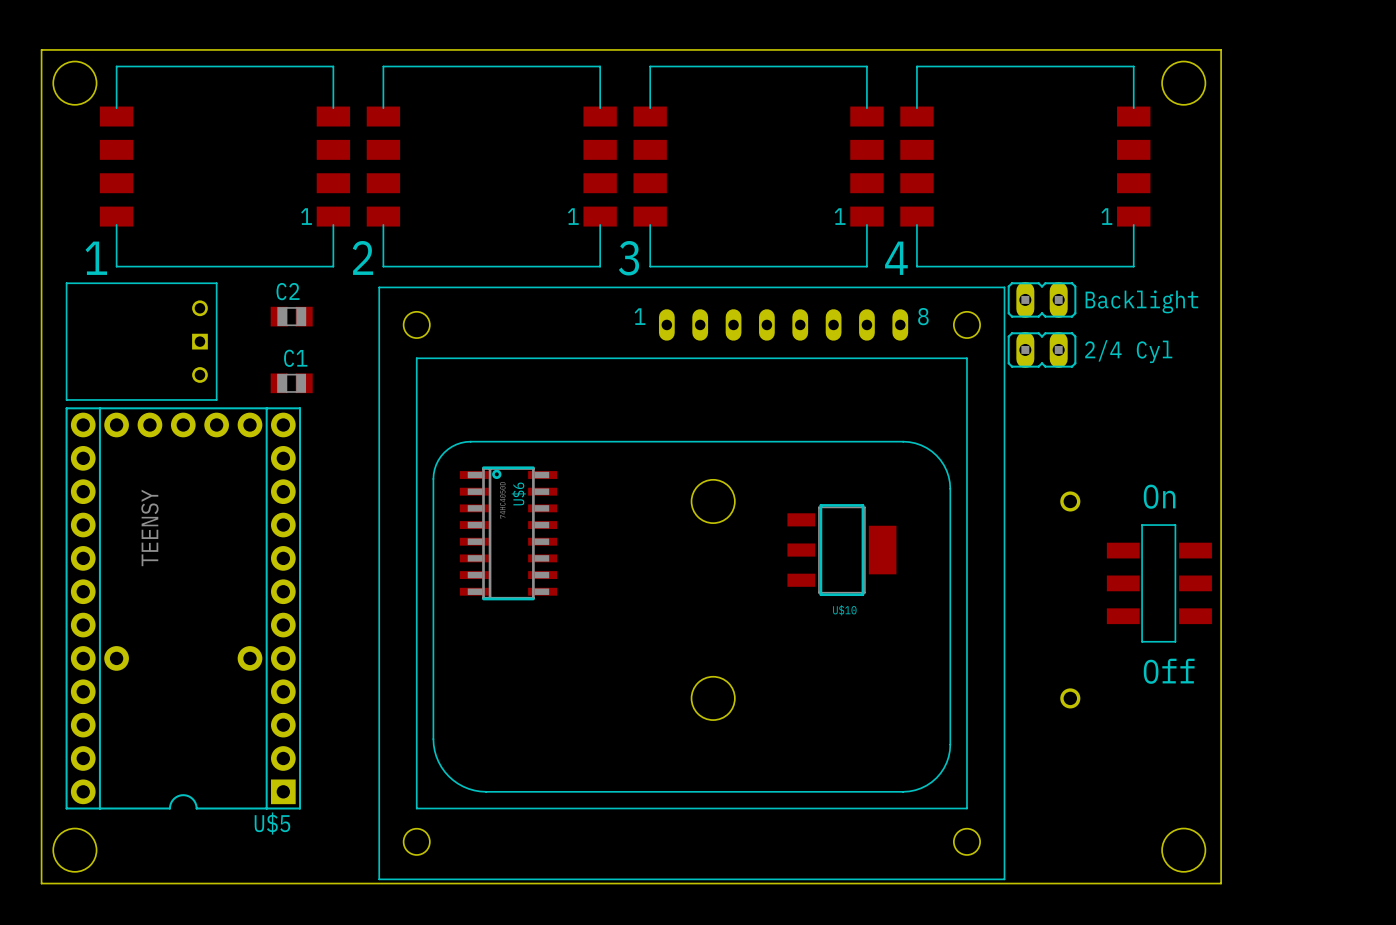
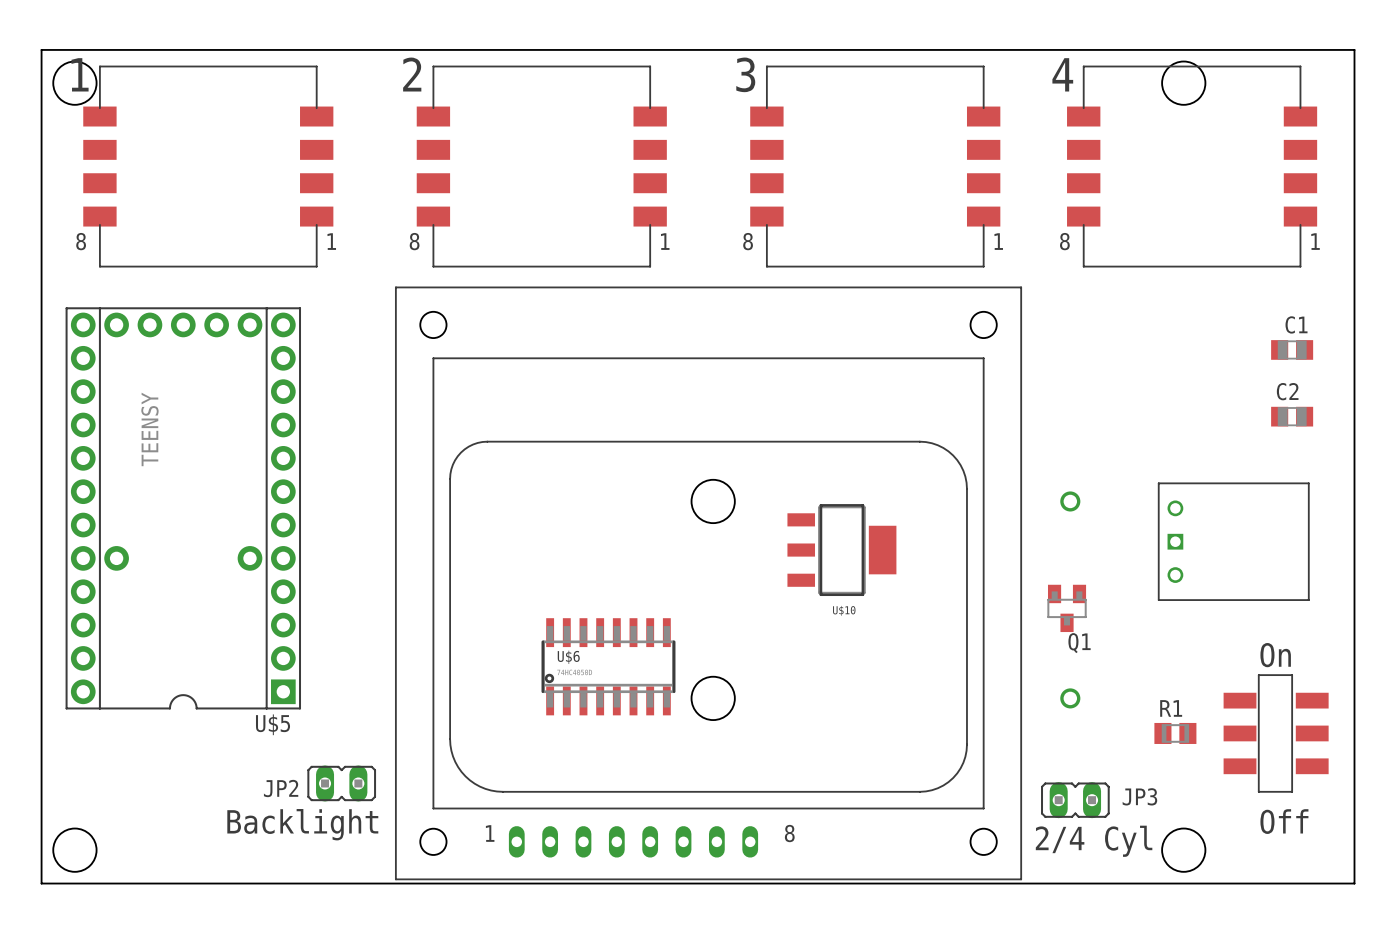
board edge: (1221, 49) (1221, 883) -> (1221, 49) (1354, 49) (1354, 883) (1221, 883)
part: none -> (208, 166)
part: (224, 166) -> none
part: (491, 166) -> none
part: none -> (541, 166)
part: (758, 166) -> none
part: none -> (875, 166)
part: (1025, 166) -> none
part: none -> (1192, 166)
text position: 2 (362, 257) -> 2 (412, 74)
text position: 1 (96, 258) -> 1 (80, 74)
text position: 3 (628, 258) -> 3 (745, 74)
text position: 4 (896, 258) -> 4 (1062, 74)
part: (1042, 299) -> none
text: Backlight (1141, 301) -> none
C2 position: (291, 316) -> (1292, 416)
part: (141, 341) -> none
part: (1042, 349) -> none
text: 2/4 Cyl (1128, 351) -> none
C1 position: (291, 383) -> (1292, 349)
text position: On (1159, 496) -> On (1275, 655)
U$6 rotation: 0° (508, 533) -> 90° counterclockwise (608, 666)
U$6 position: (508, 533) -> (608, 666)
part: none -> (1233, 541)
part: (691, 583) -> none
part: none -> (708, 583)
part position: (1159, 583) -> (1276, 733)
U$5 position: (183, 608) -> (183, 508)
Q1: none -> (1067, 608)
text position: Off (1169, 671) -> Off (1284, 821)
R1: none -> (1175, 733)
JP2: none -> (341, 783)
JP3: none -> (1075, 800)
text: none -> Backlight (302, 824)
text: none -> 2/4 Cyl (1094, 841)

